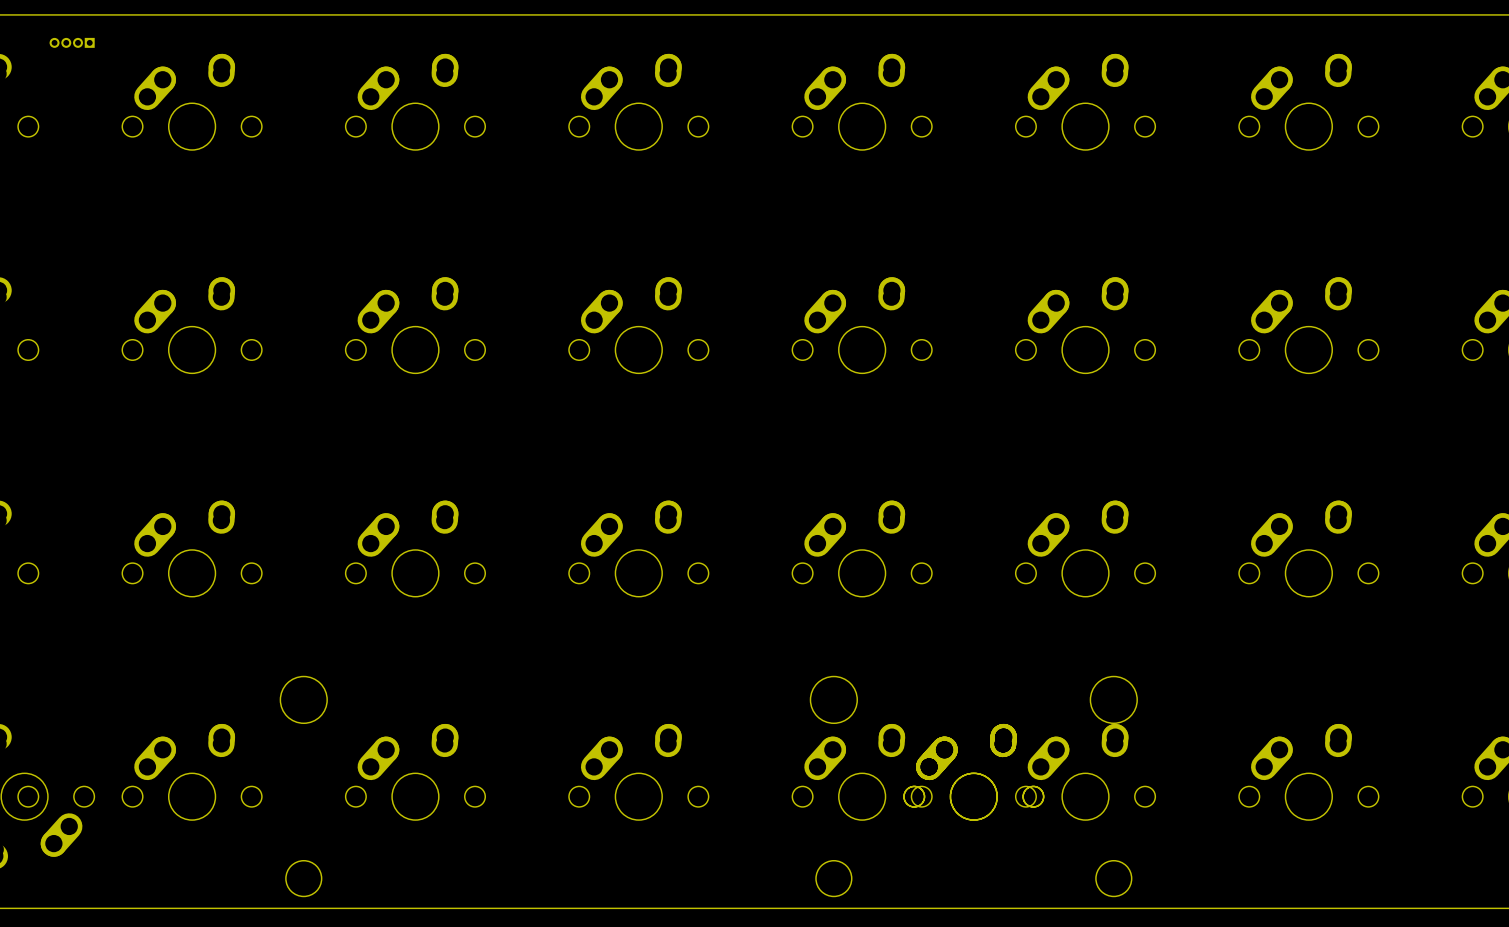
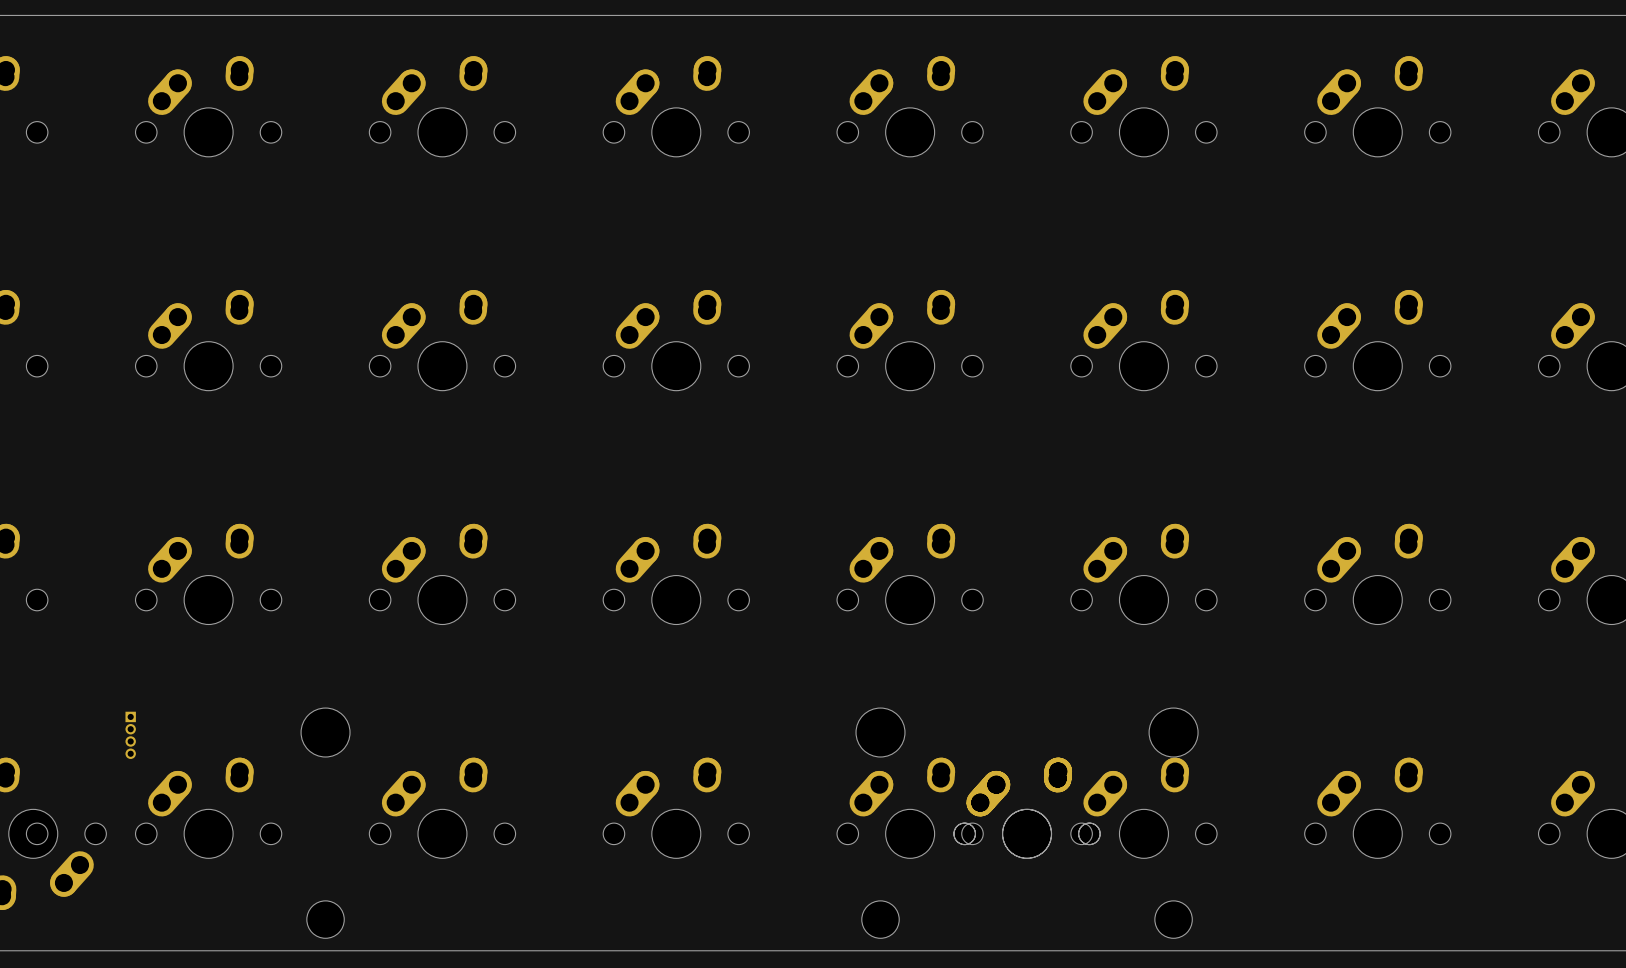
part: (72, 42) -> none
part: none -> (130, 735)

